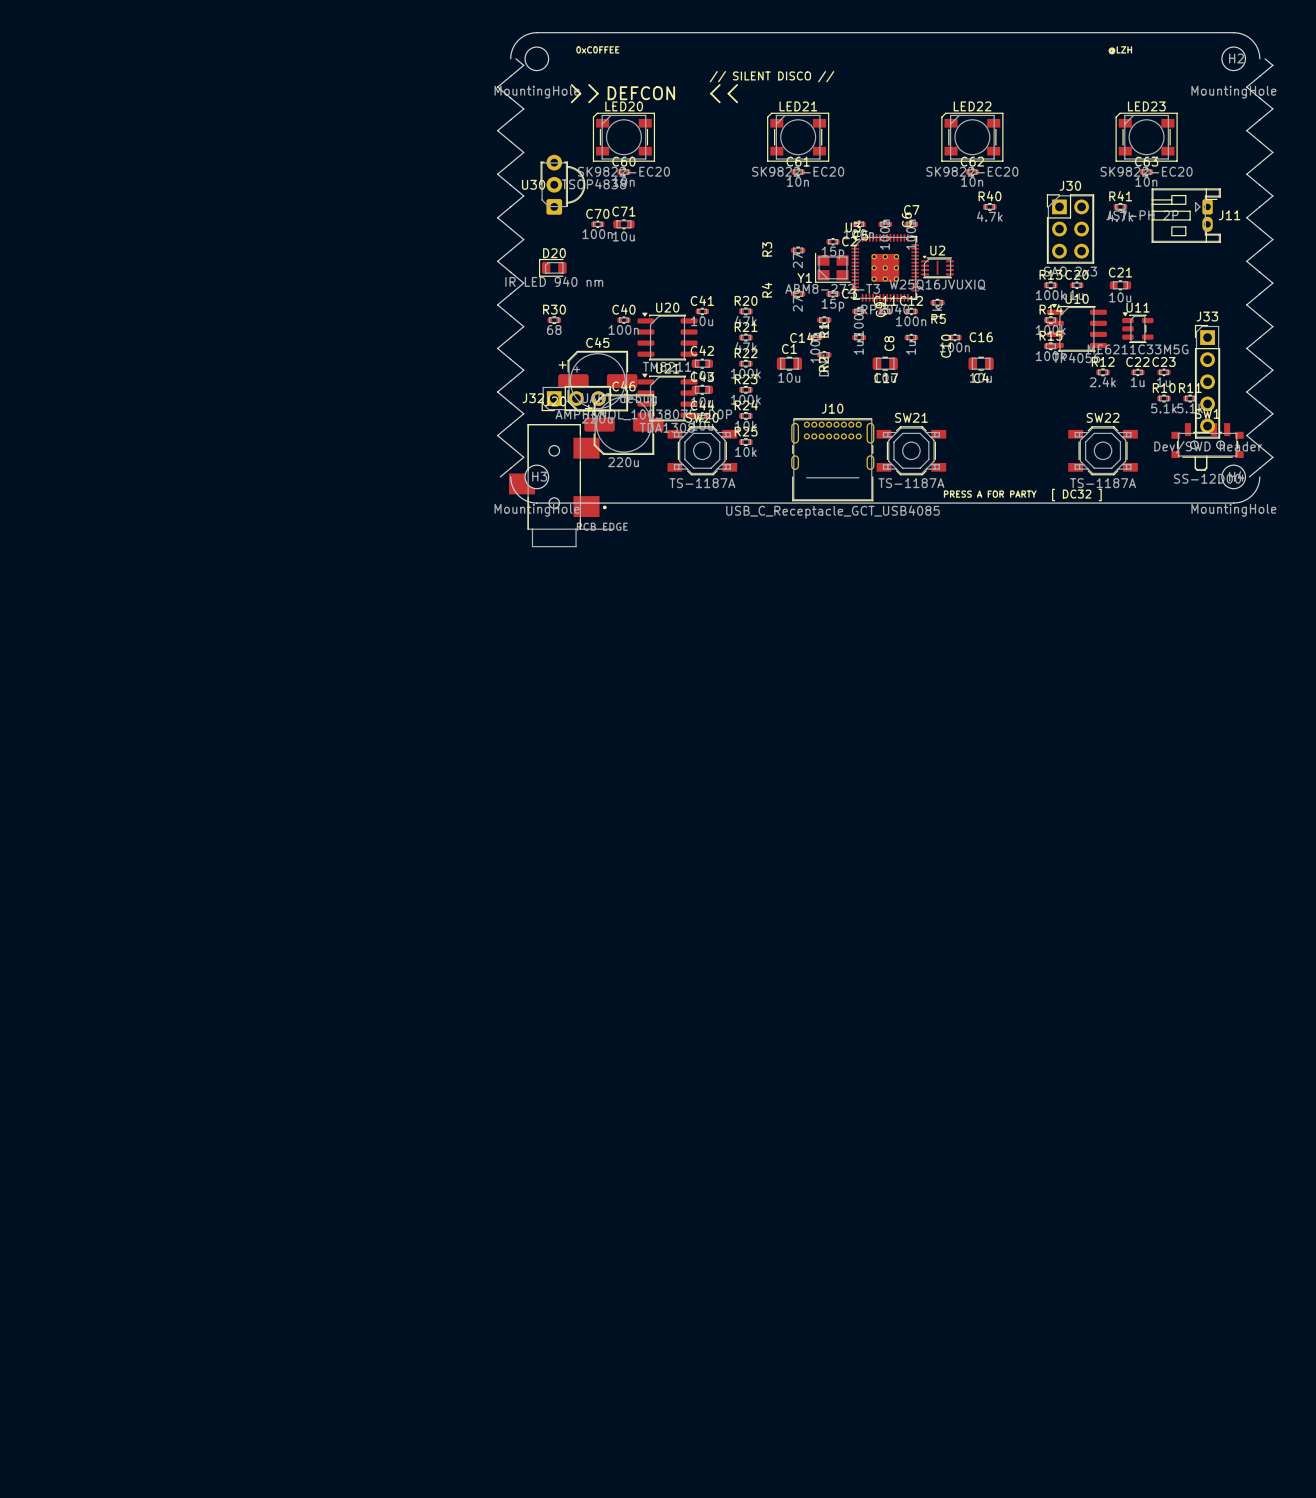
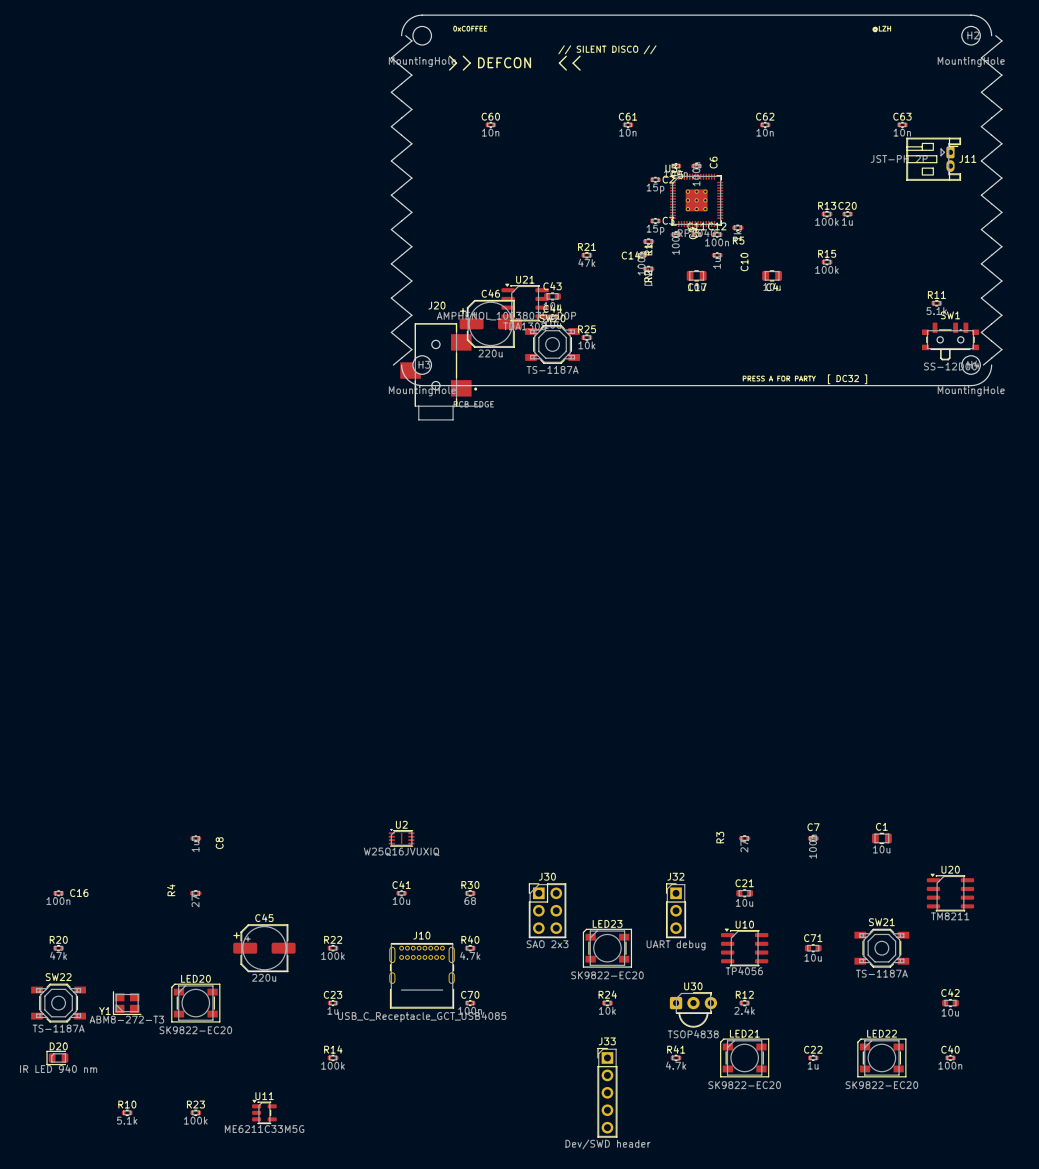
LED20 position: (623, 137) -> (195, 1003)
LED21 position: (798, 137) -> (744, 1057)
LED22 position: (972, 137) -> (881, 1057)
LED23 position: (1146, 137) -> (607, 948)
U30 rotation: 0° (562, 184) -> 90° clockwise (693, 1009)
U30 position: (562, 184) -> (693, 1009)
R40 position: (989, 206) -> (470, 948)
R41 position: (1120, 206) -> (676, 1057)
C70 position: (597, 224) -> (470, 1003)
C71 position: (623, 224) -> (813, 948)
C7 position: (911, 224) -> (813, 838)
J30 position: (1070, 229) -> (547, 910)
R3 position: (798, 250) -> (744, 838)
D20 position: (552, 267) -> (57, 1057)
Y1 position: (833, 267) -> (127, 1003)
U2 position: (937, 267) -> (401, 837)
C21 position: (1120, 285) -> (744, 893)
R4 position: (798, 294) -> (195, 893)
C41 position: (702, 311) -> (401, 893)
R20 position: (745, 311) -> (58, 948)
R30 position: (554, 320) -> (470, 893)
C40 position: (623, 320) -> (950, 1057)
R14 position: (1050, 320) -> (333, 1057)
U10 position: (1076, 327) -> (744, 947)
U11 position: (1137, 327) -> (264, 1111)
U20 position: (667, 336) -> (950, 892)
C8 position: (859, 337) -> (195, 838)
C16 position: (954, 337) -> (58, 893)
C45 footprint: [558, 350, 638, 412] -> [233, 924, 296, 972]
C42 position: (702, 363) -> (950, 1003)
R22 position: (745, 363) -> (333, 948)
C1 position: (789, 363) -> (881, 838)
R12 position: (1103, 372) -> (744, 1003)
C22 position: (1137, 372) -> (813, 1057)
C23 position: (1164, 372) -> (333, 1003)
J33 position: (1207, 381) -> (607, 1092)
R23 position: (745, 389) -> (195, 1112)
J32 rotation: 0° (576, 398) -> 90° clockwise (676, 910)
J32 position: (576, 398) -> (676, 910)
R10 position: (1164, 398) -> (127, 1112)
R24 position: (745, 415) -> (607, 1003)
SW21 position: (911, 450) -> (881, 948)
SW22 position: (1103, 450) -> (58, 1003)
J10 position: (832, 459) -> (422, 975)

